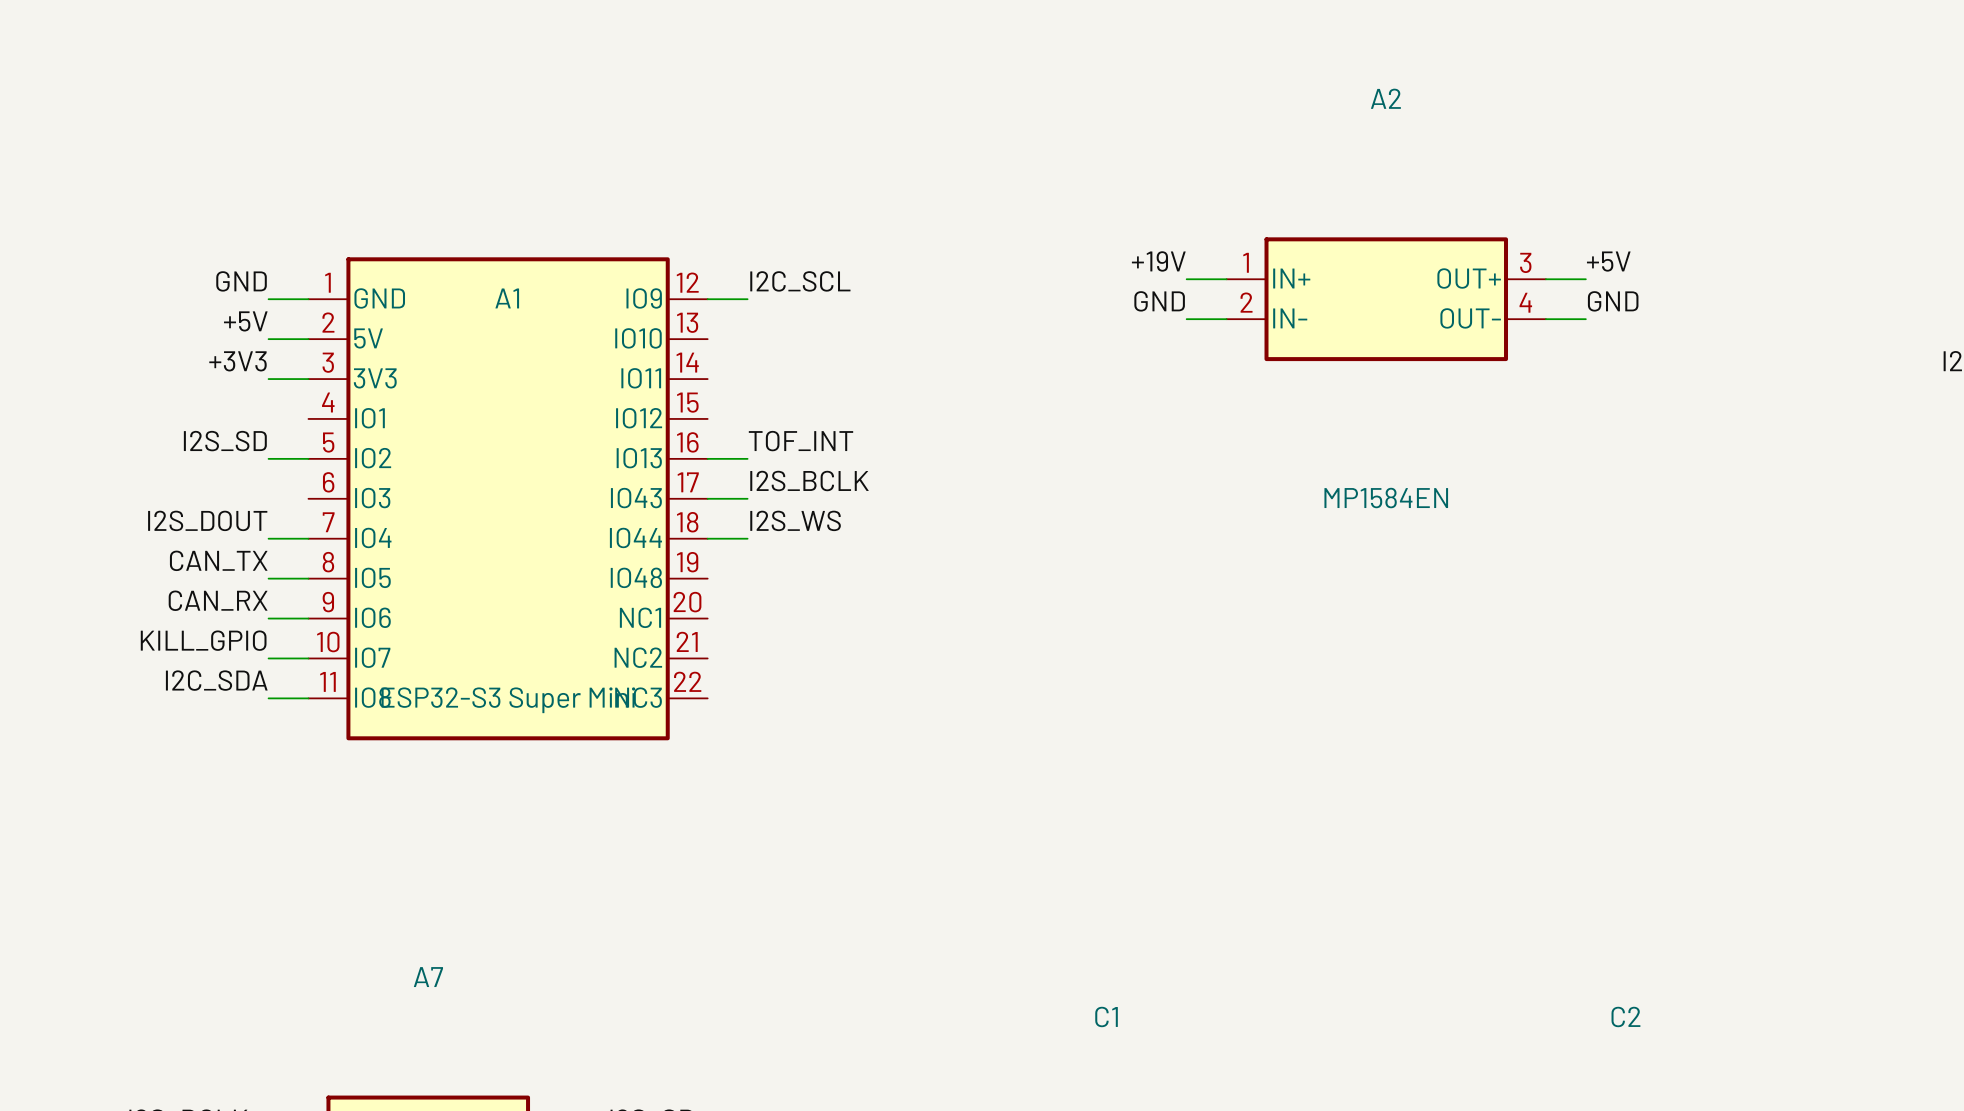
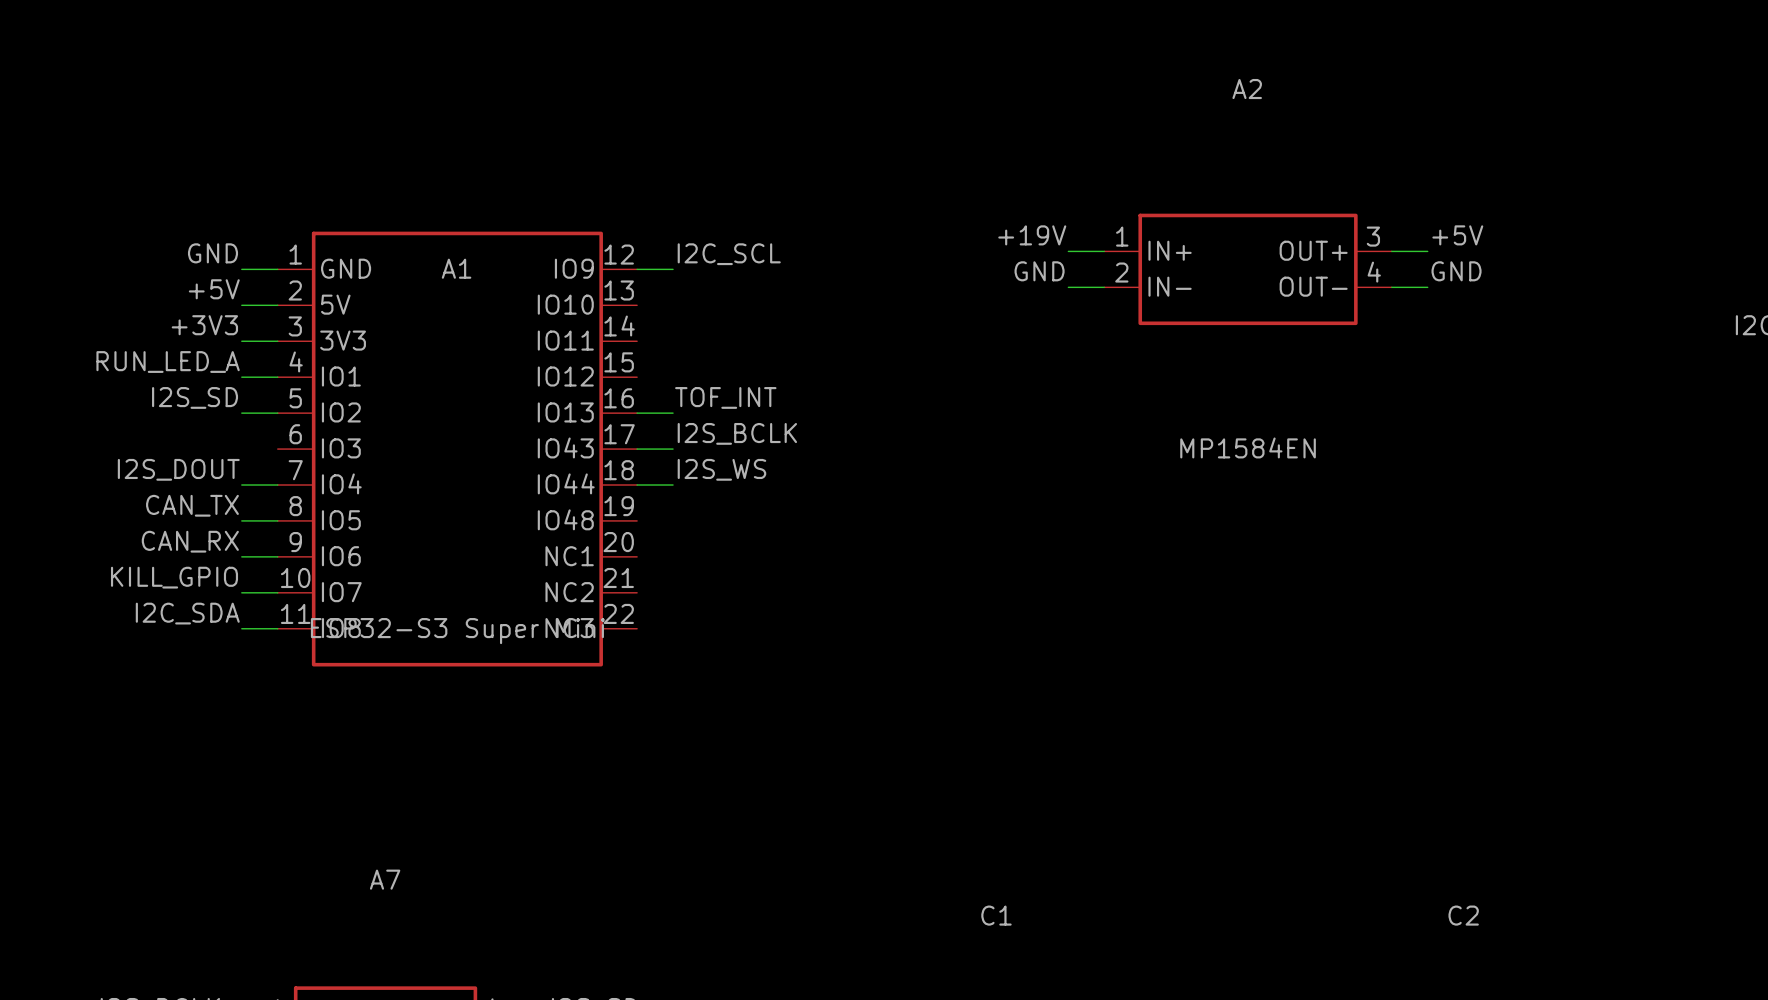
label: none -> RUN_LED_A (168, 362)
wire: none -> (241, 377) (277, 377)

